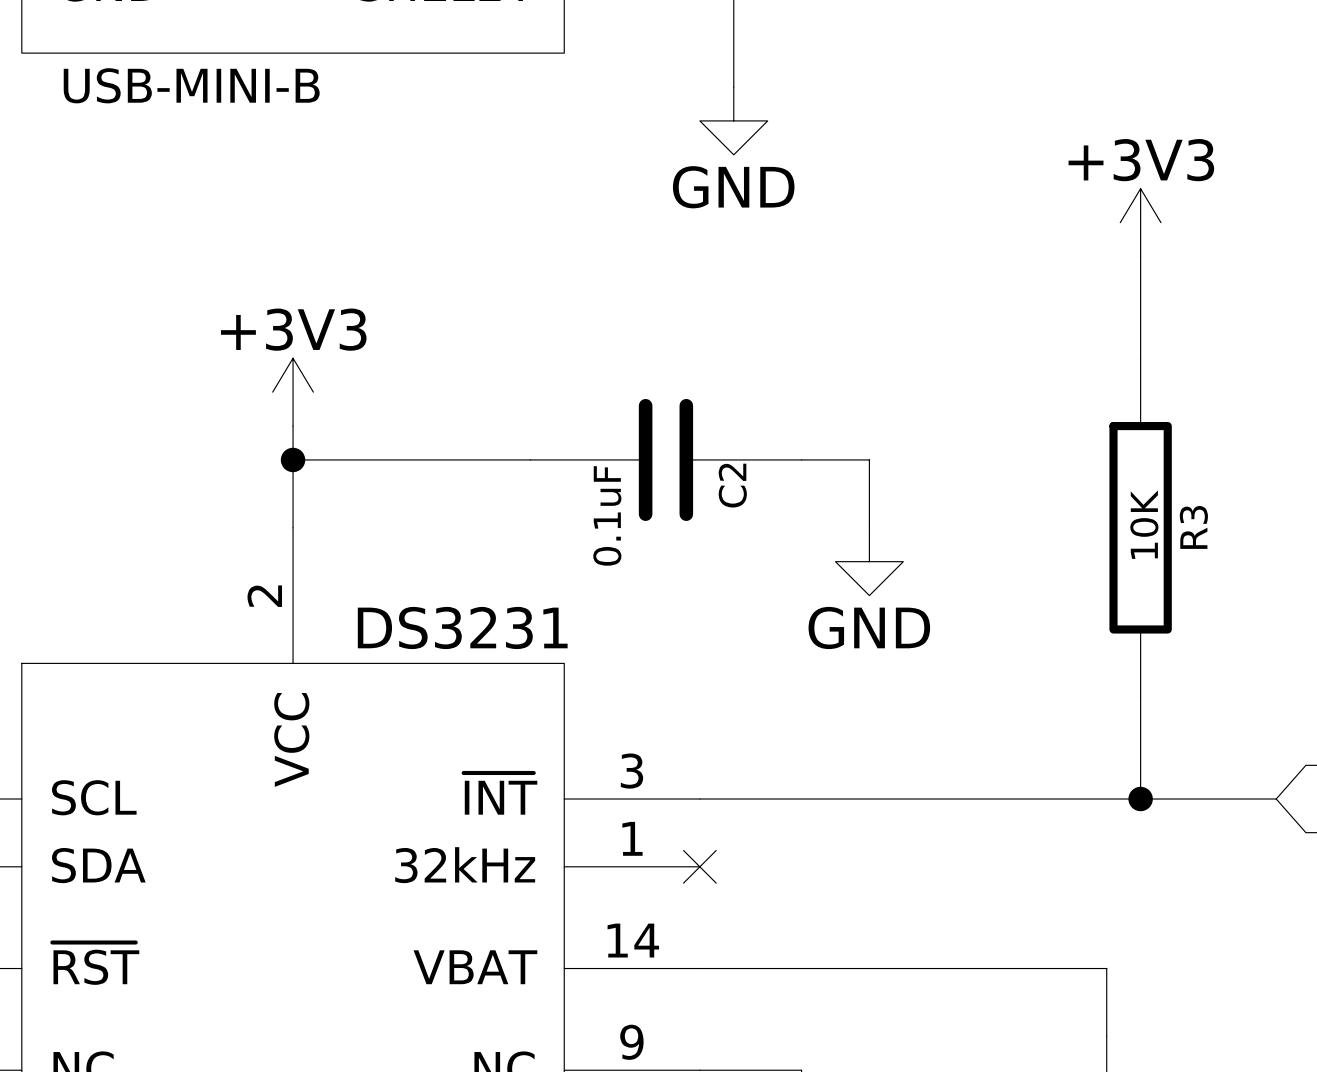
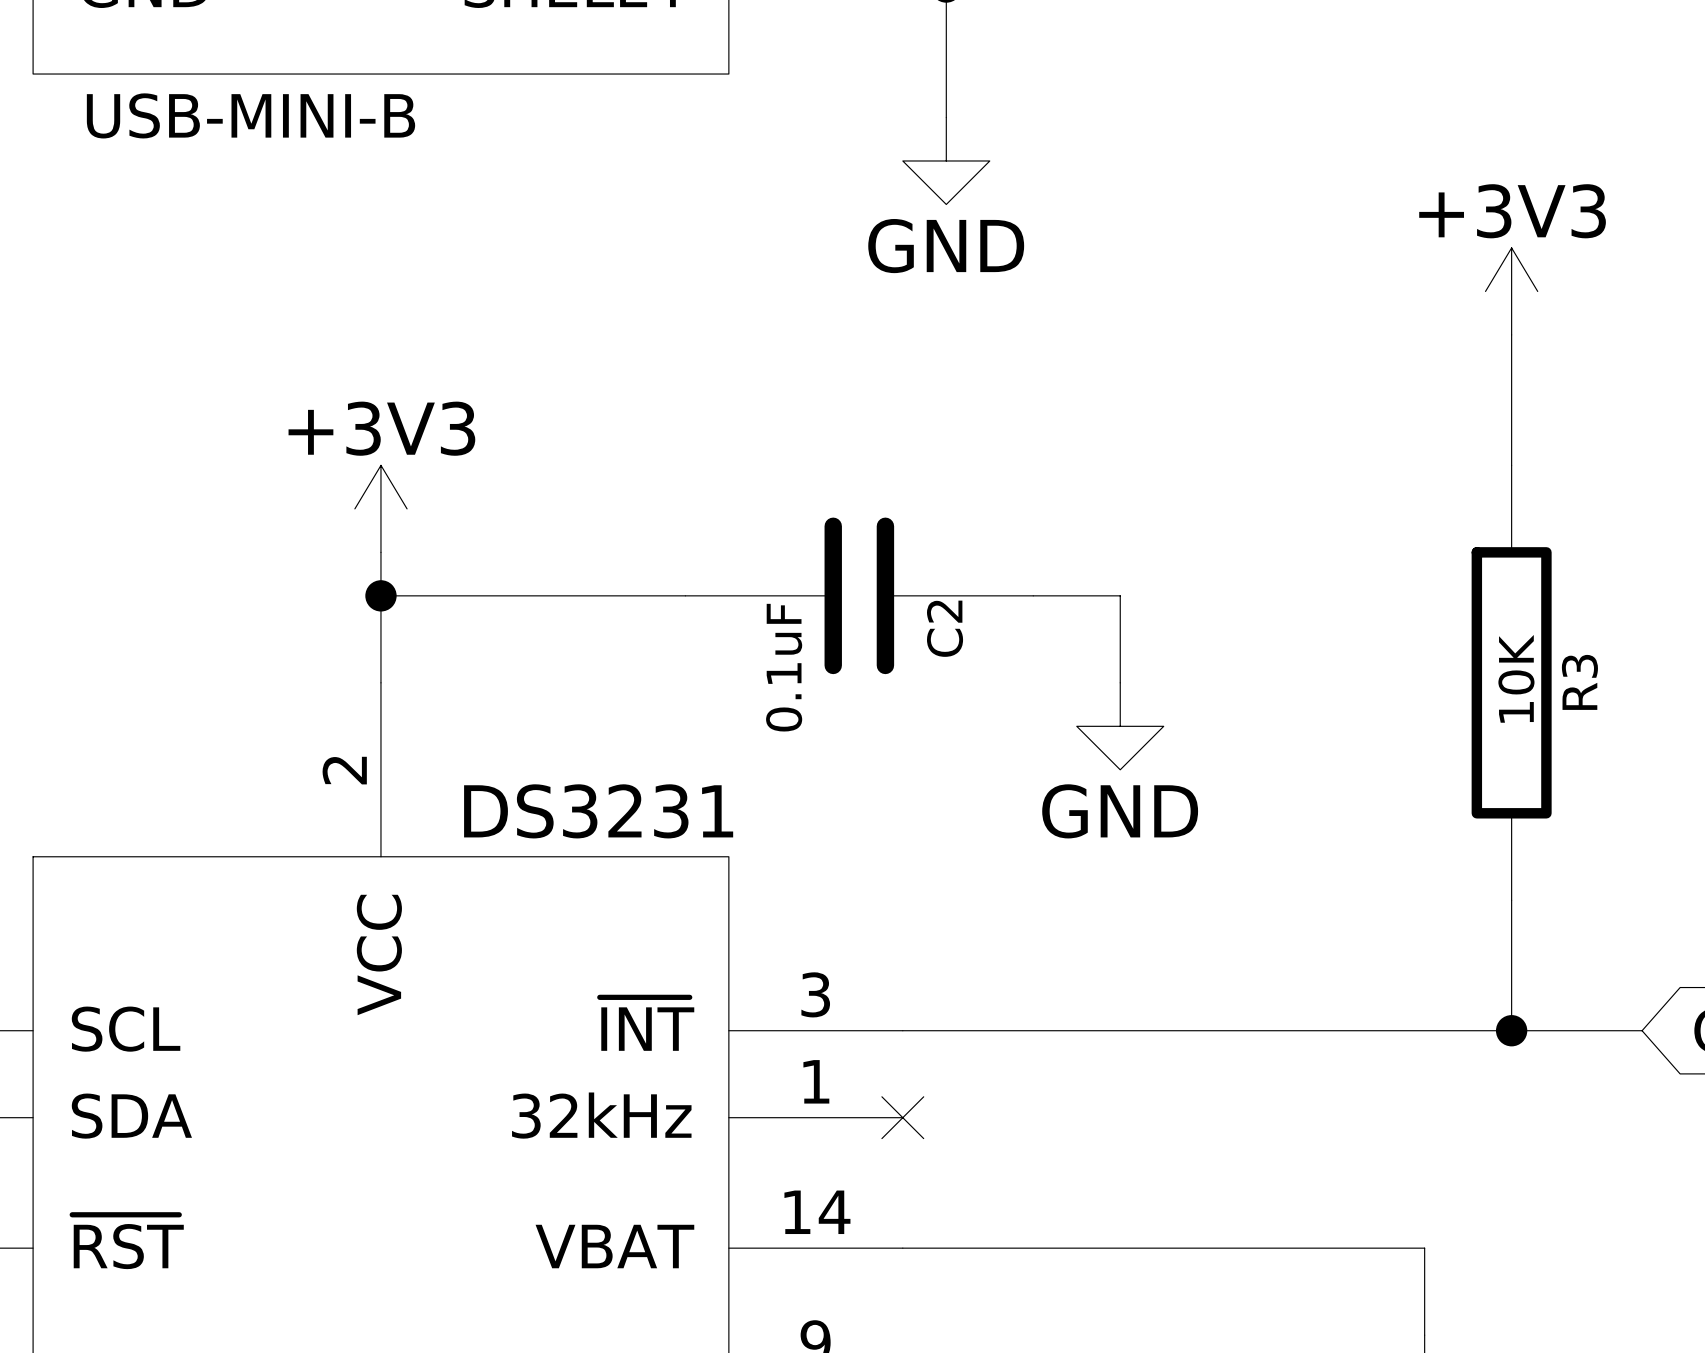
power symbol position: +3V3 (1140, 222) -> +3V3 (1511, 291)
wire: (1140, 256) (1140, 358) -> (1511, 334) (1511, 465)
R3 position: (1140, 527) -> (1511, 682)
wire: (1140, 697) (1140, 799) -> (1511, 900) (1511, 1030)
junction position: (1140, 799) -> (1511, 1030)

